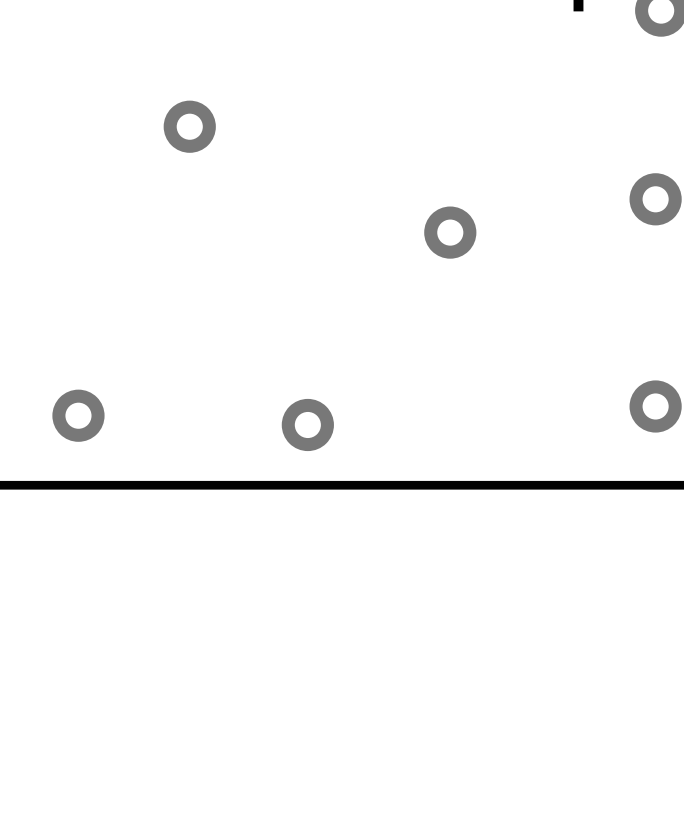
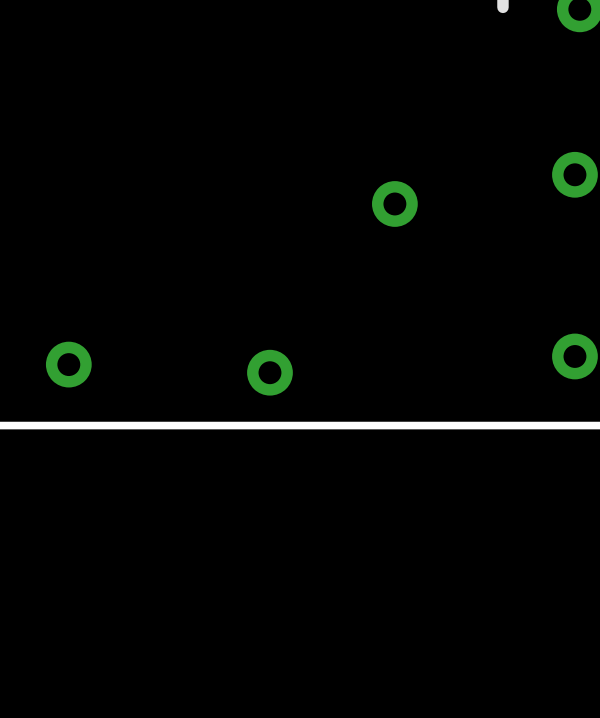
via: (189, 126) -> none

